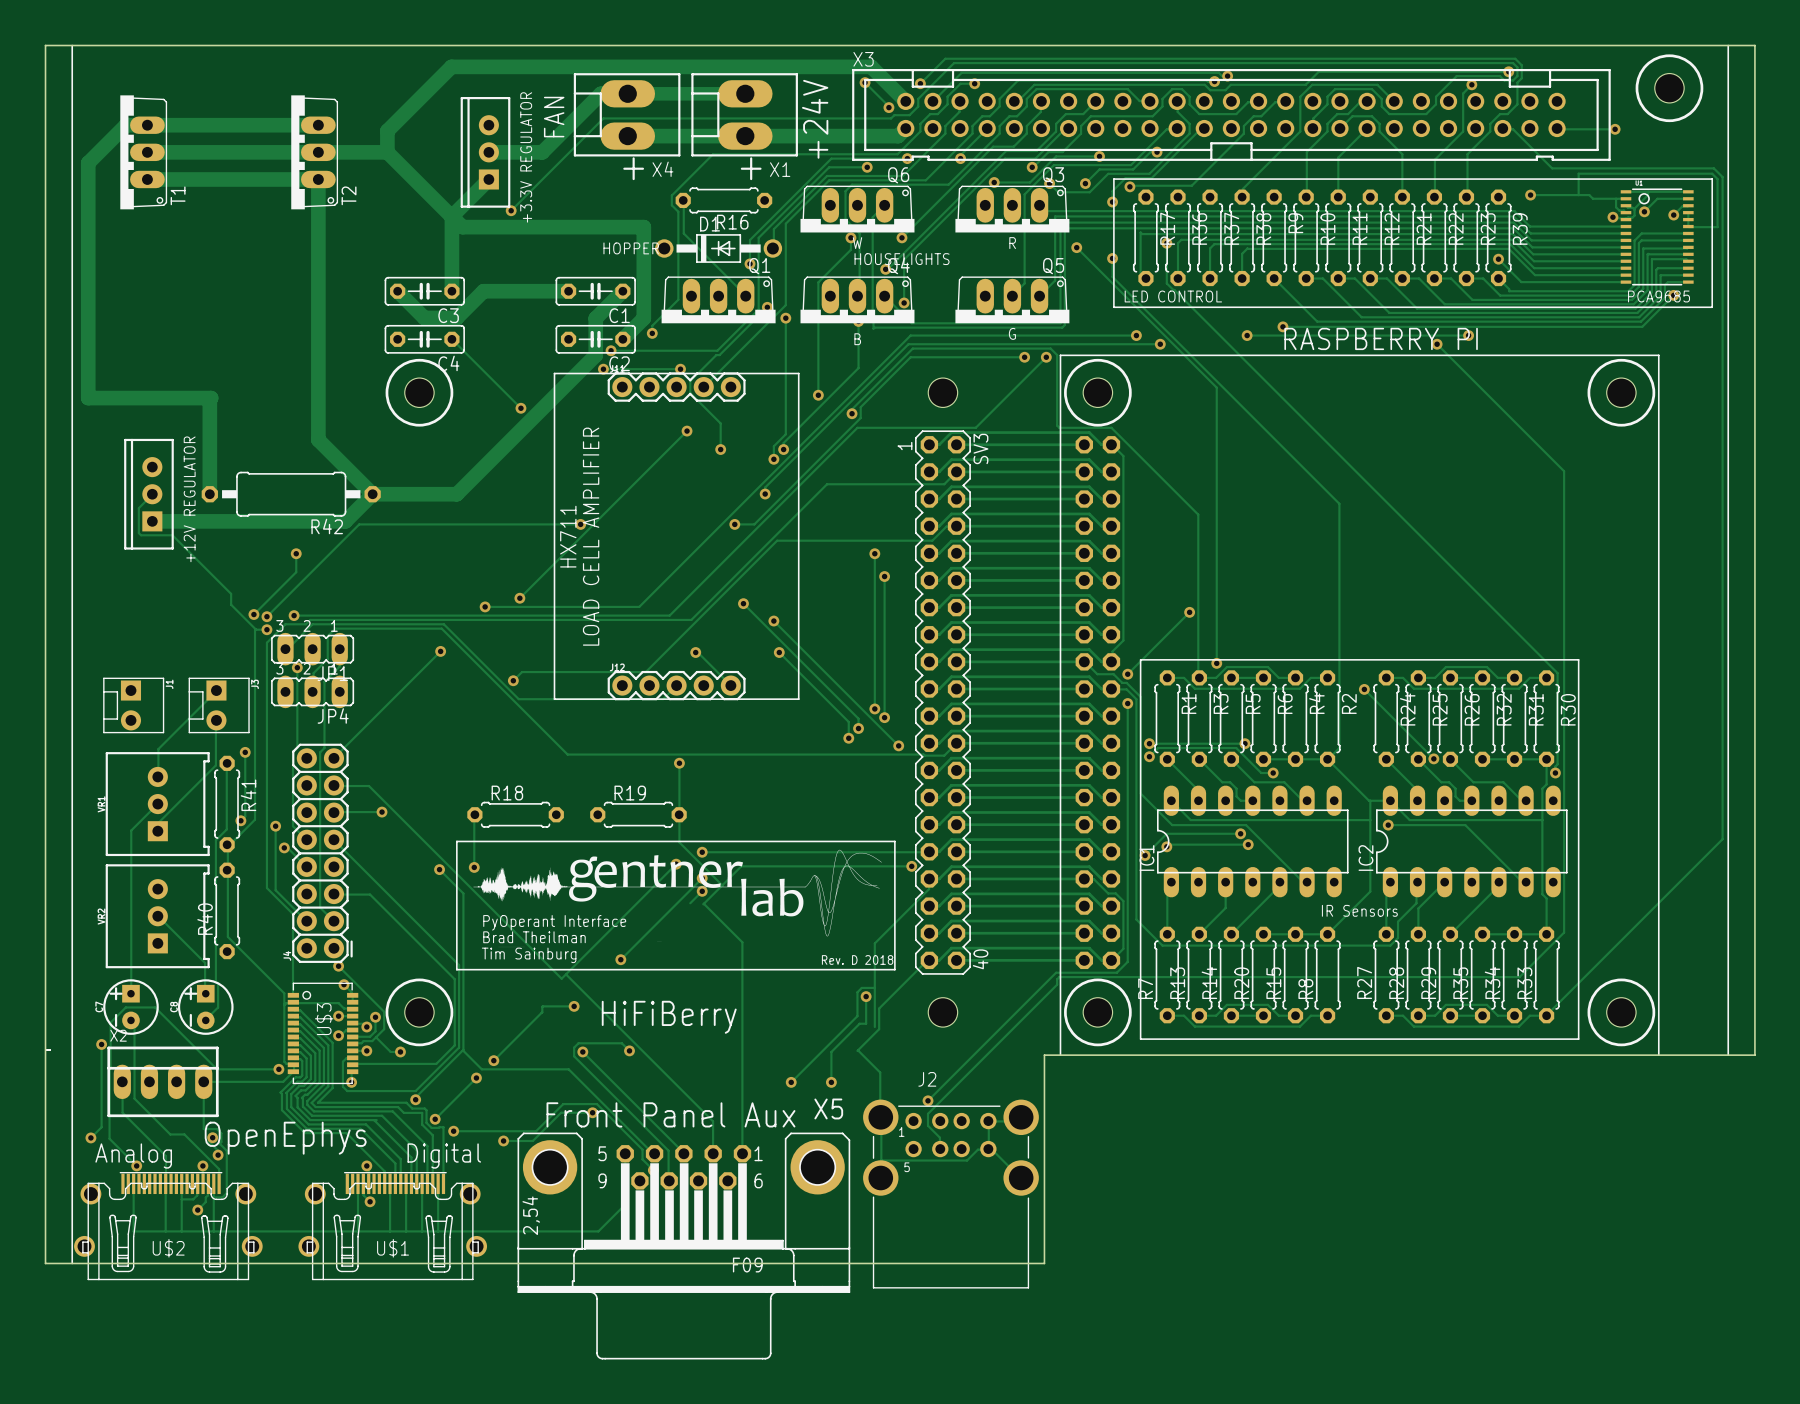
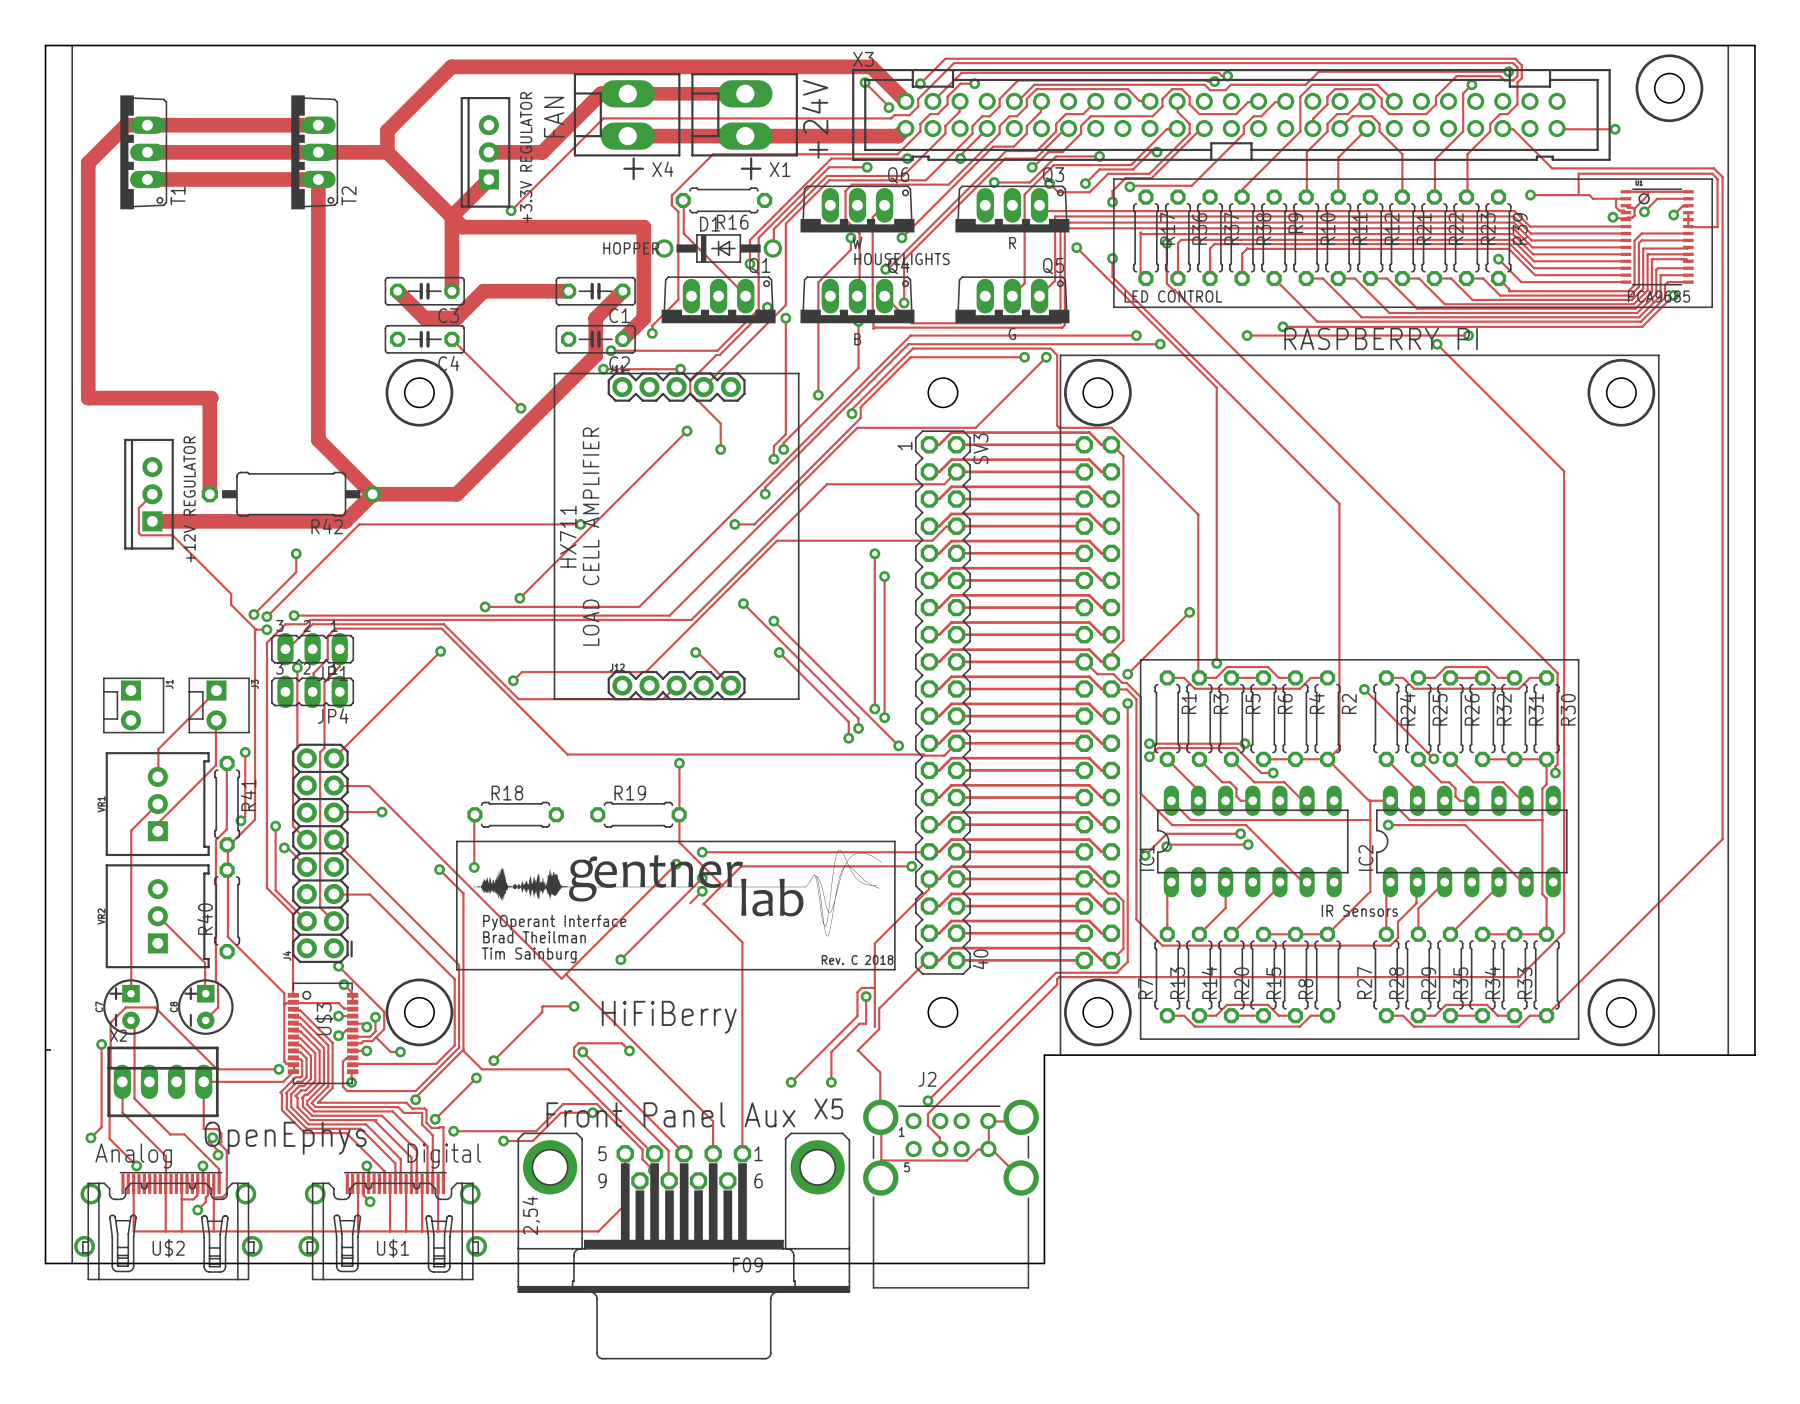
text: Rev. D 2018 (857, 959) -> Rev. C 2018 (857, 959)

